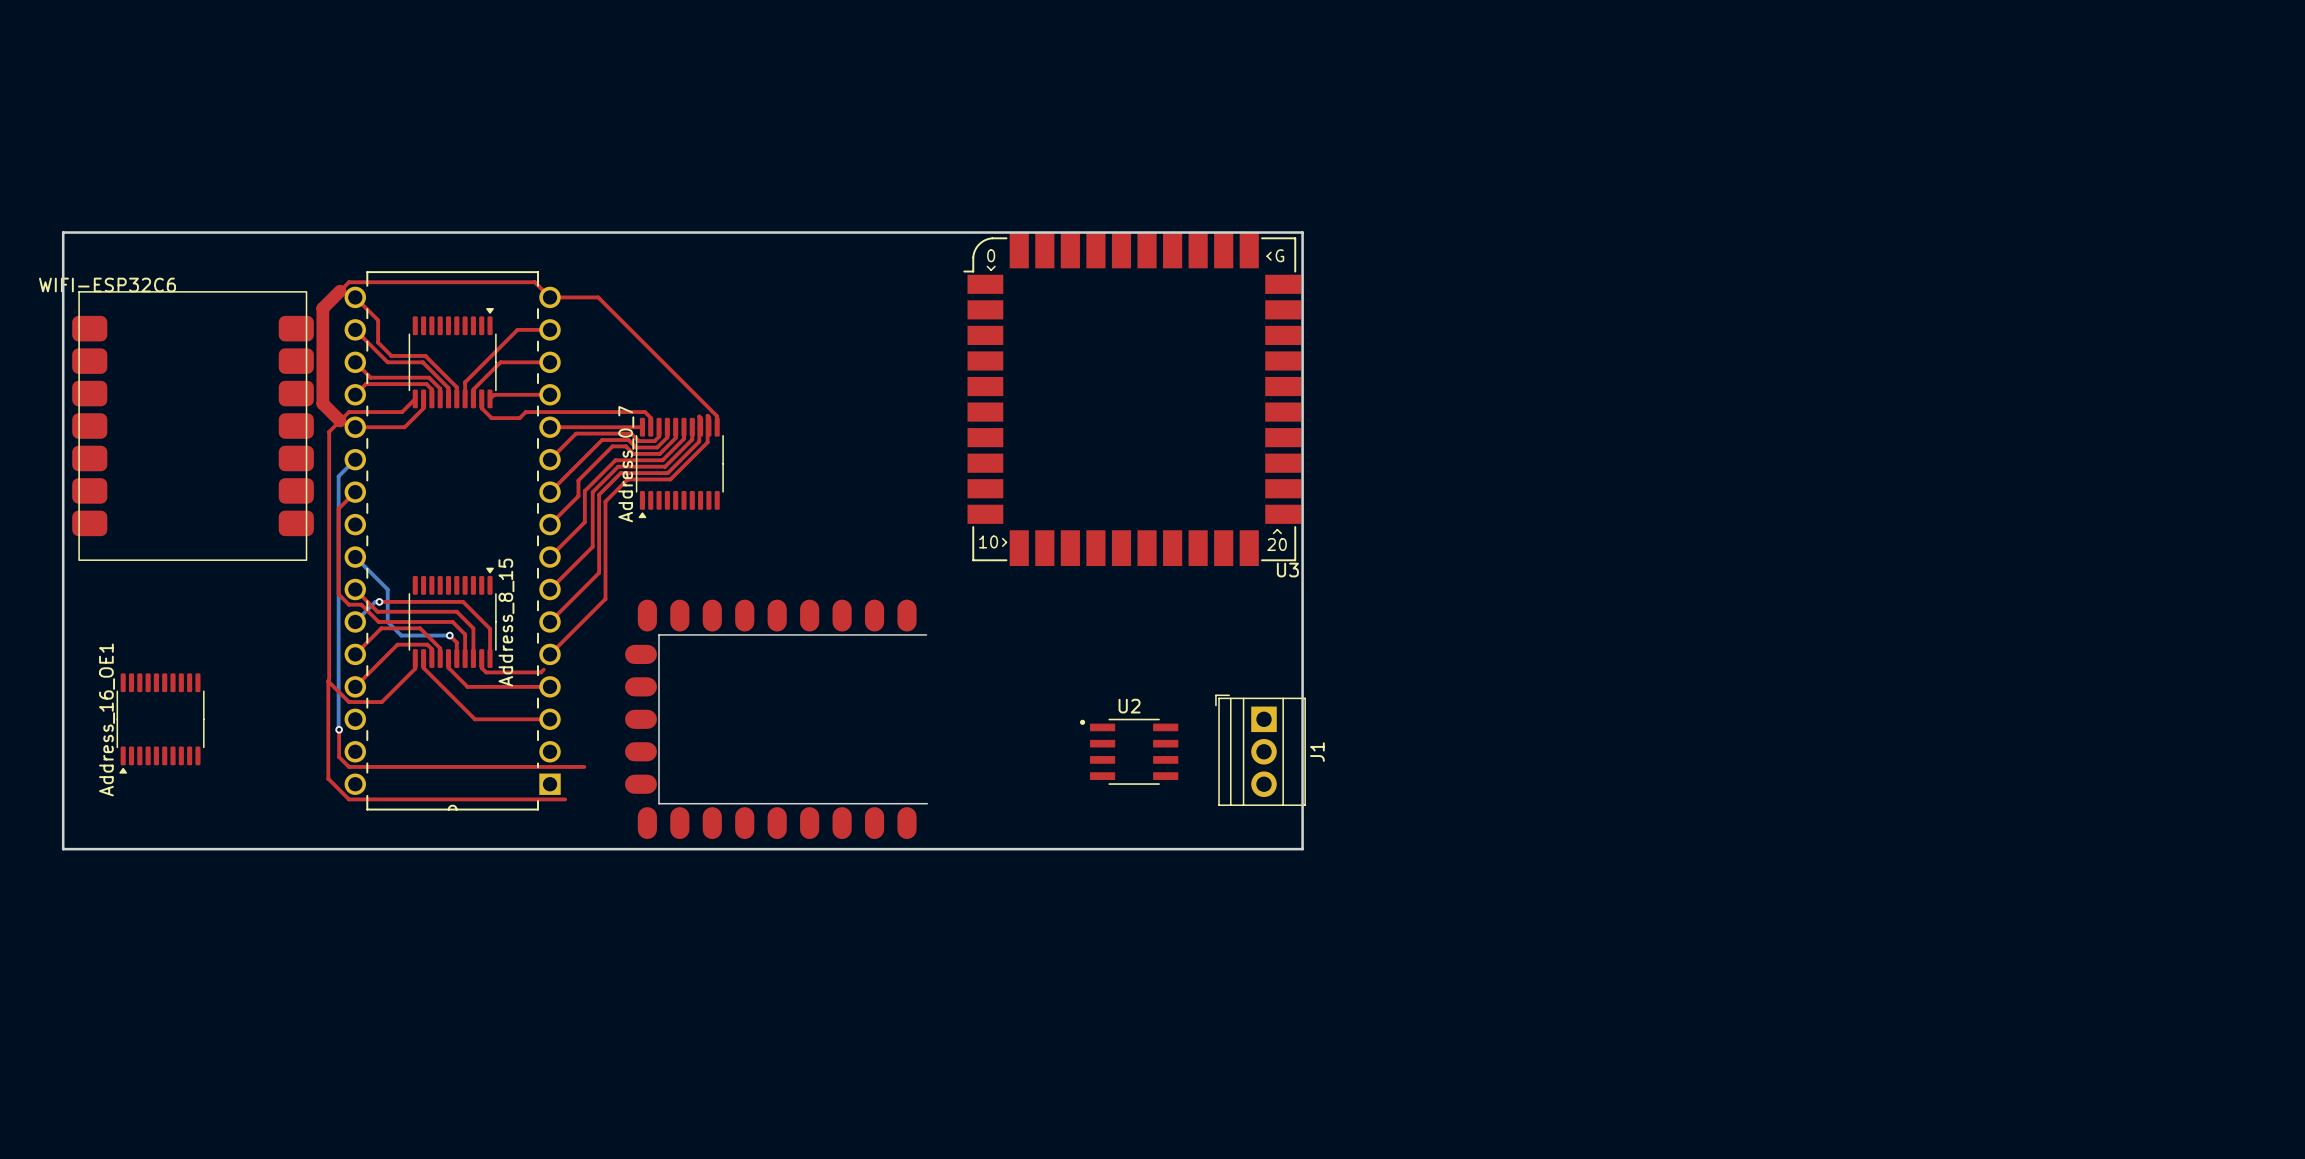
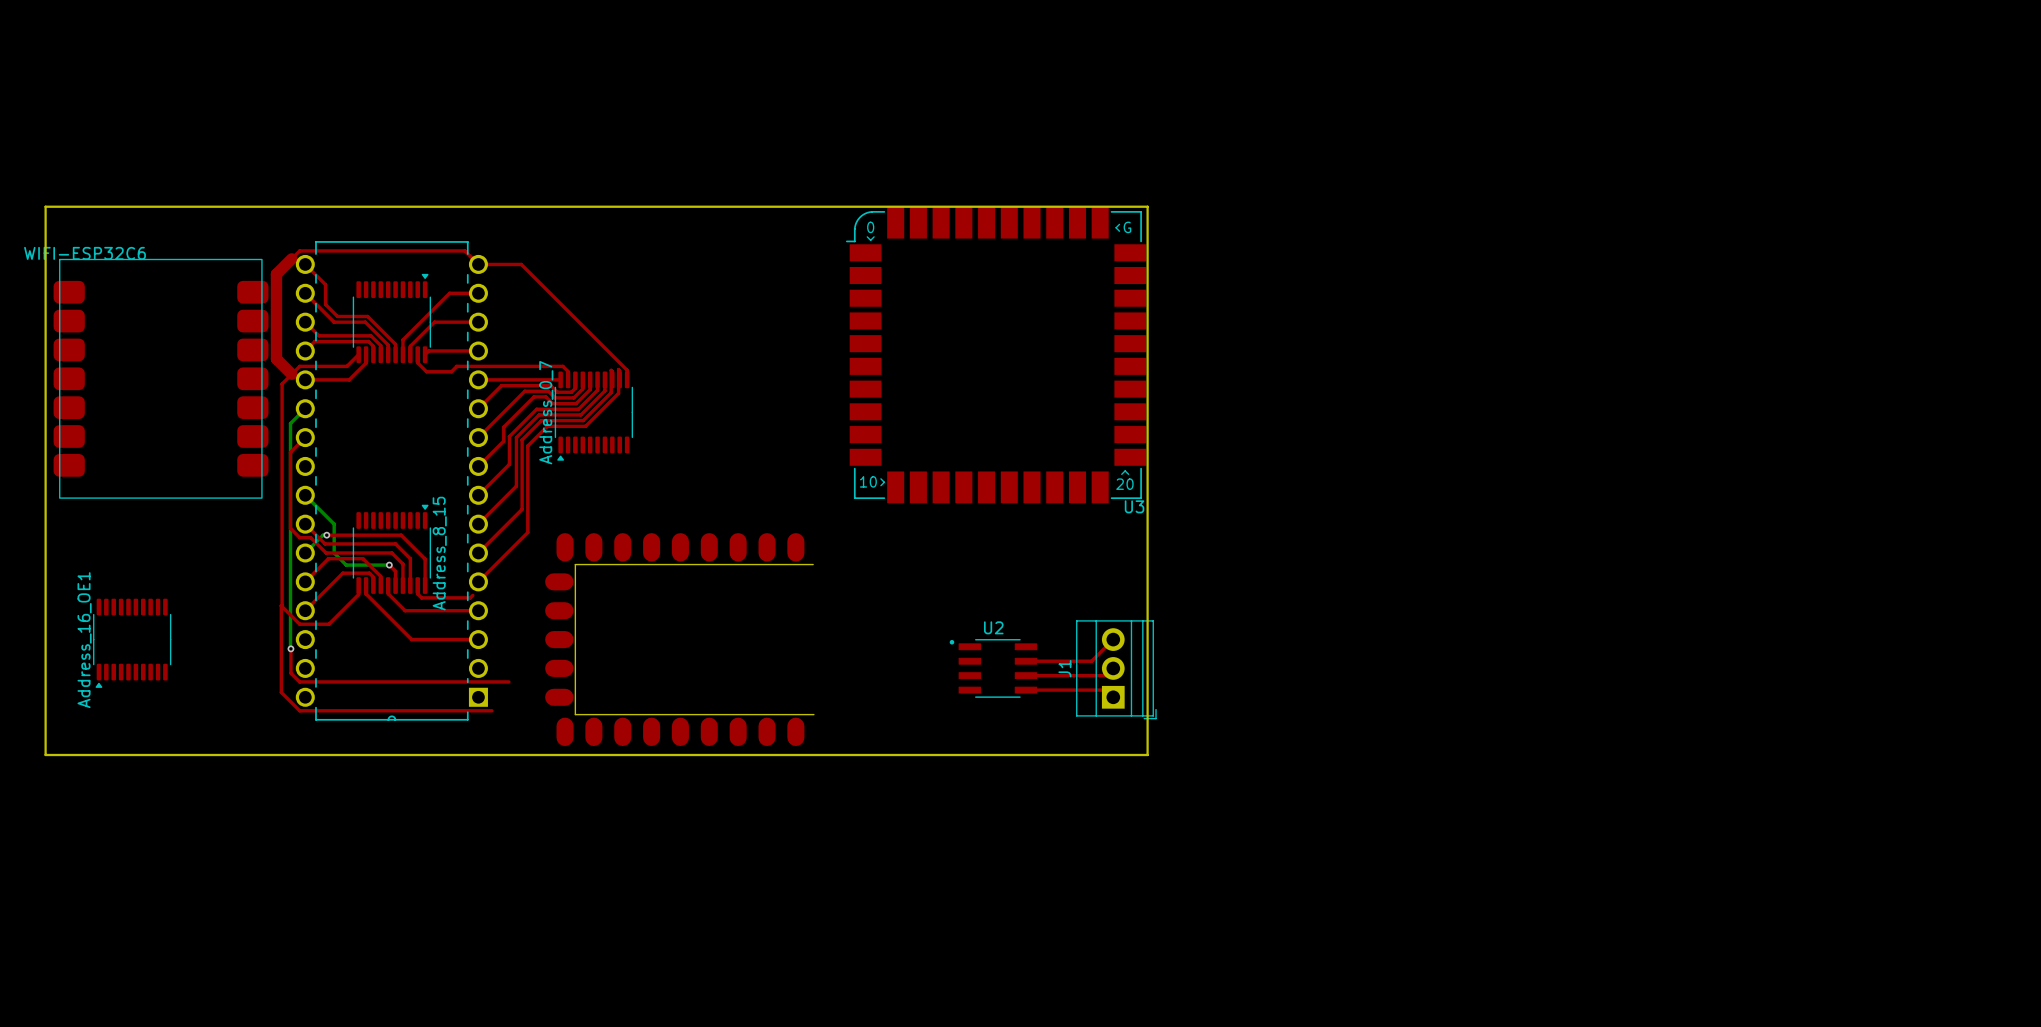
top track: none -> (1113, 639) (1091, 661) (1025, 661)
J1 rotation: 0° (1260, 750) -> 180° (1116, 669)
top track: none -> (1113, 668) (1106, 675) (1025, 675)
top track: none -> (1025, 690) (1106, 690) (1113, 697)

